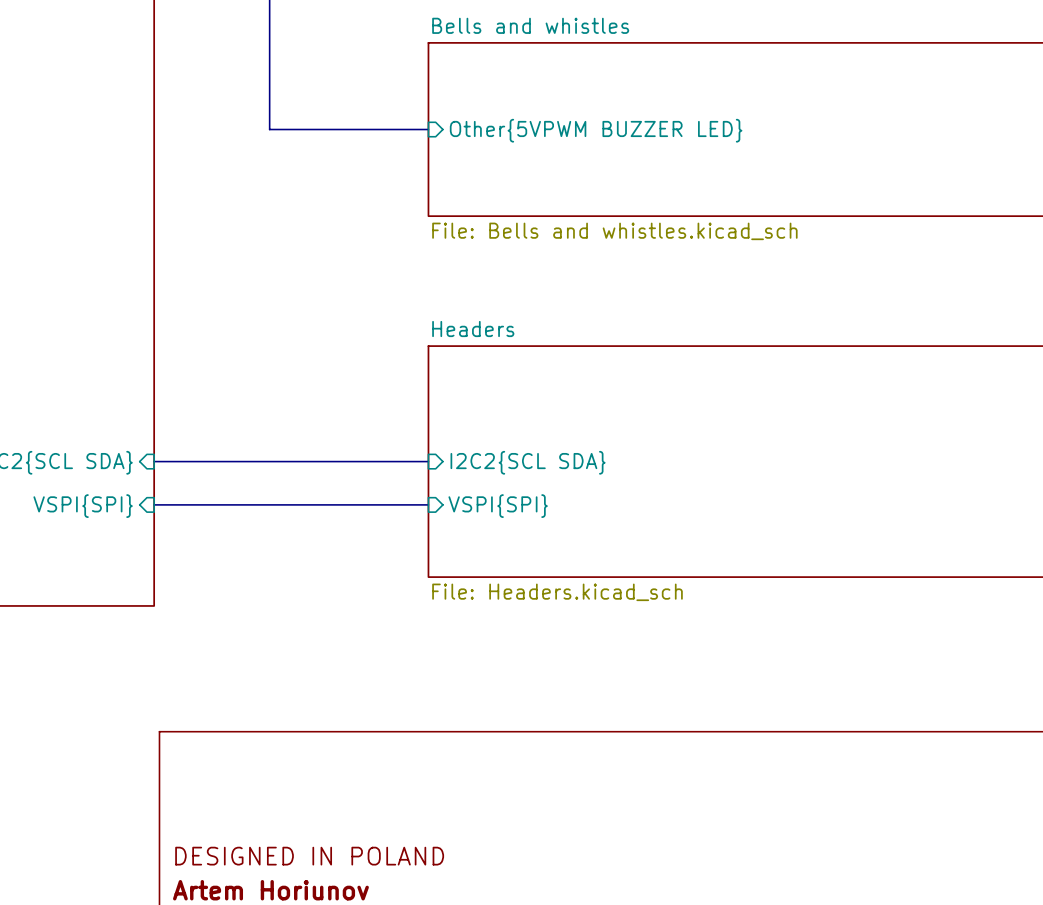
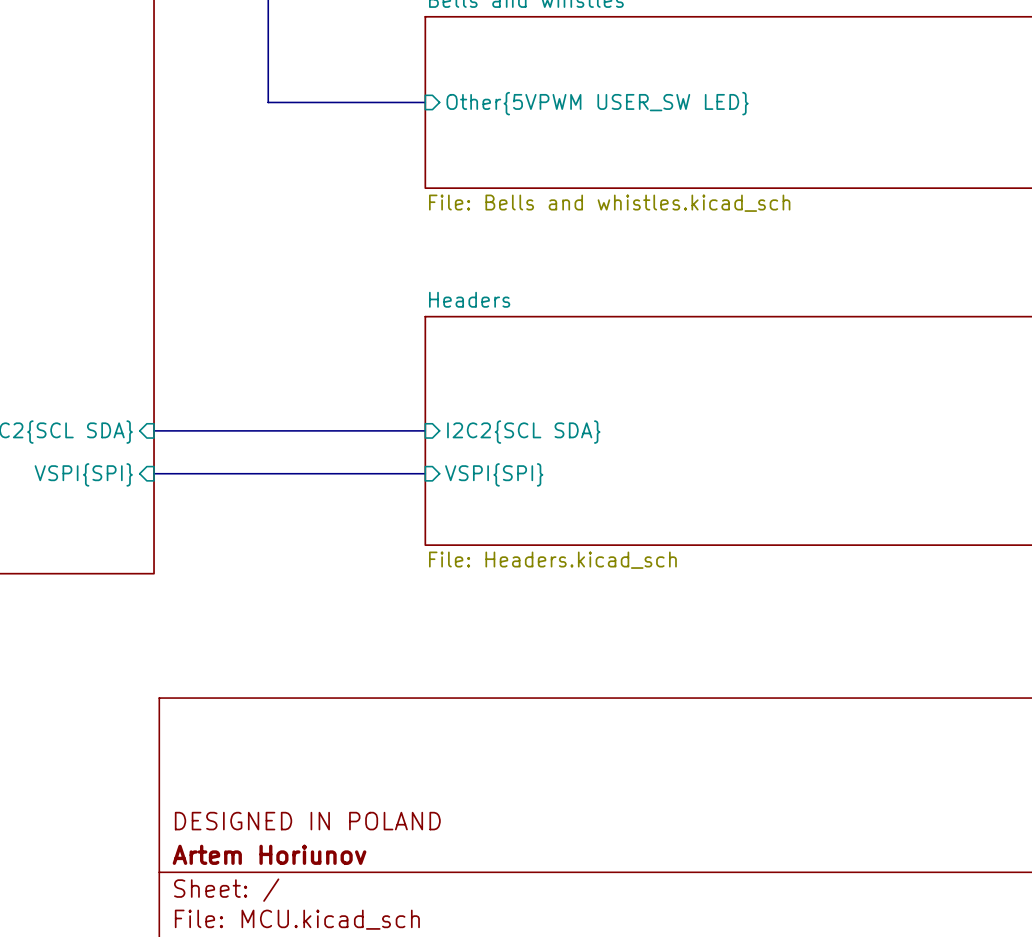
sheet pin: Other{5VPWM BUZZER LED} (596, 130) -> Other{5VPWM USER_SW LED} (597, 103)

